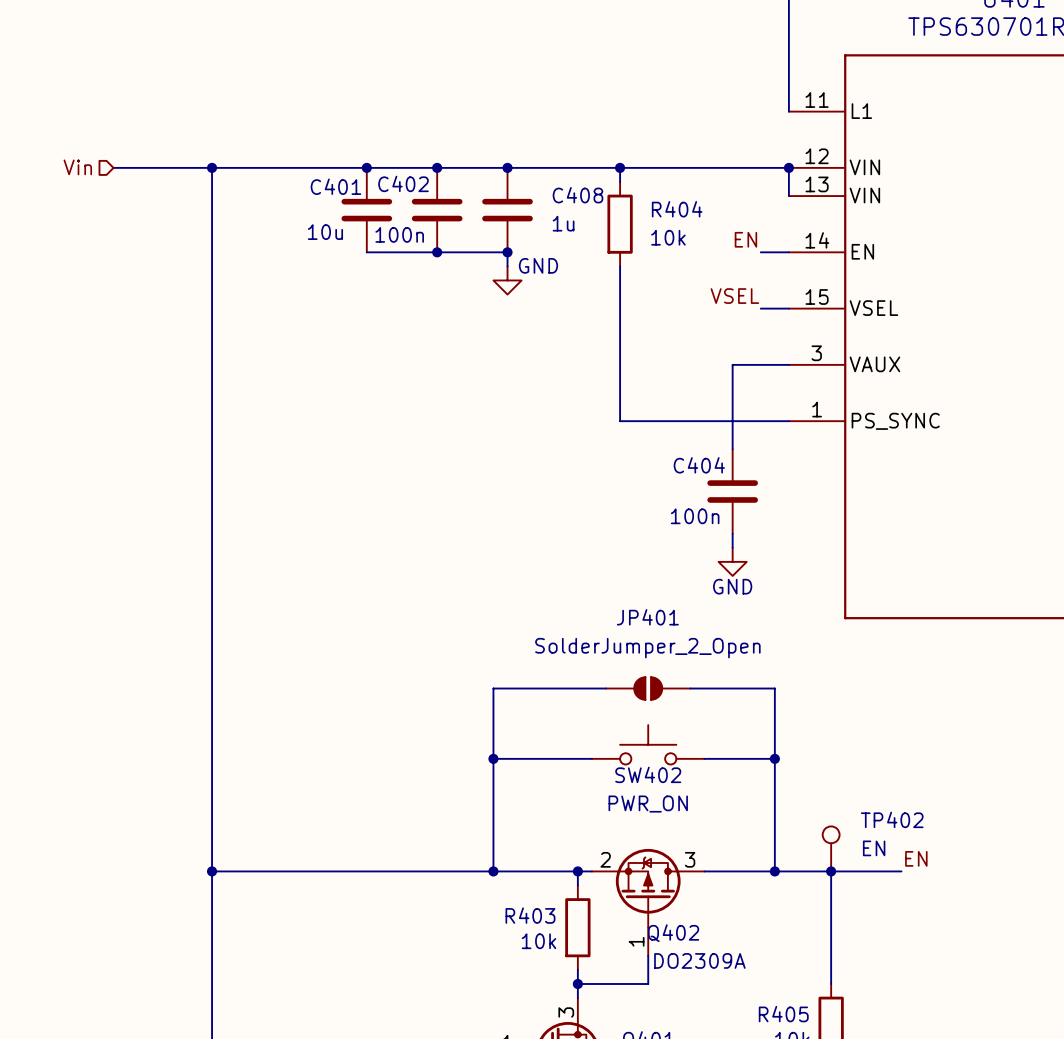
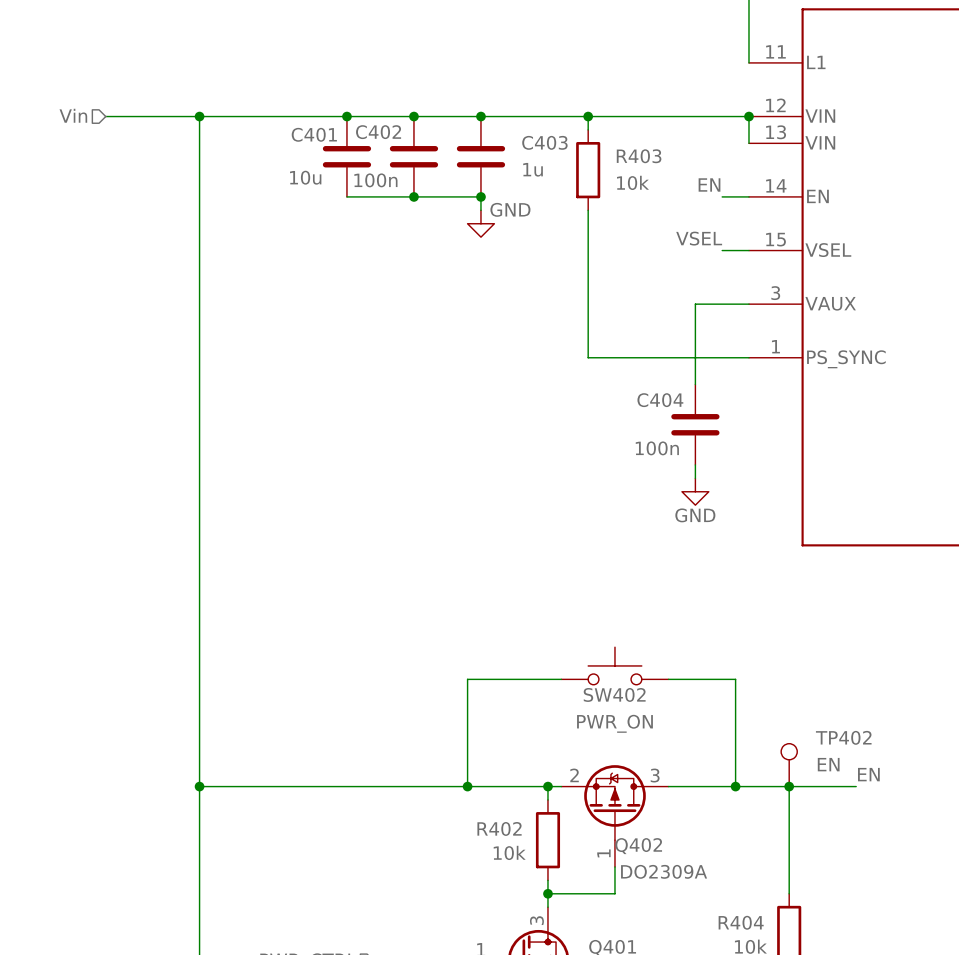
C408 name: C408 (577, 195) -> C403 (544, 142)
R404 name: R404 (677, 209) -> R403 (639, 156)
wire: (606, 688) (493, 688) (493, 758) -> none
JP401: SolderJumper_2_Open (648, 688) -> none
wire: (690, 688) (774, 688) (774, 758) -> none
junction: (493, 758) -> none
junction: (774, 758) -> none
R403 name: R403 (530, 915) -> R402 (499, 828)
R405 name: R405 (783, 1014) -> R404 (741, 922)

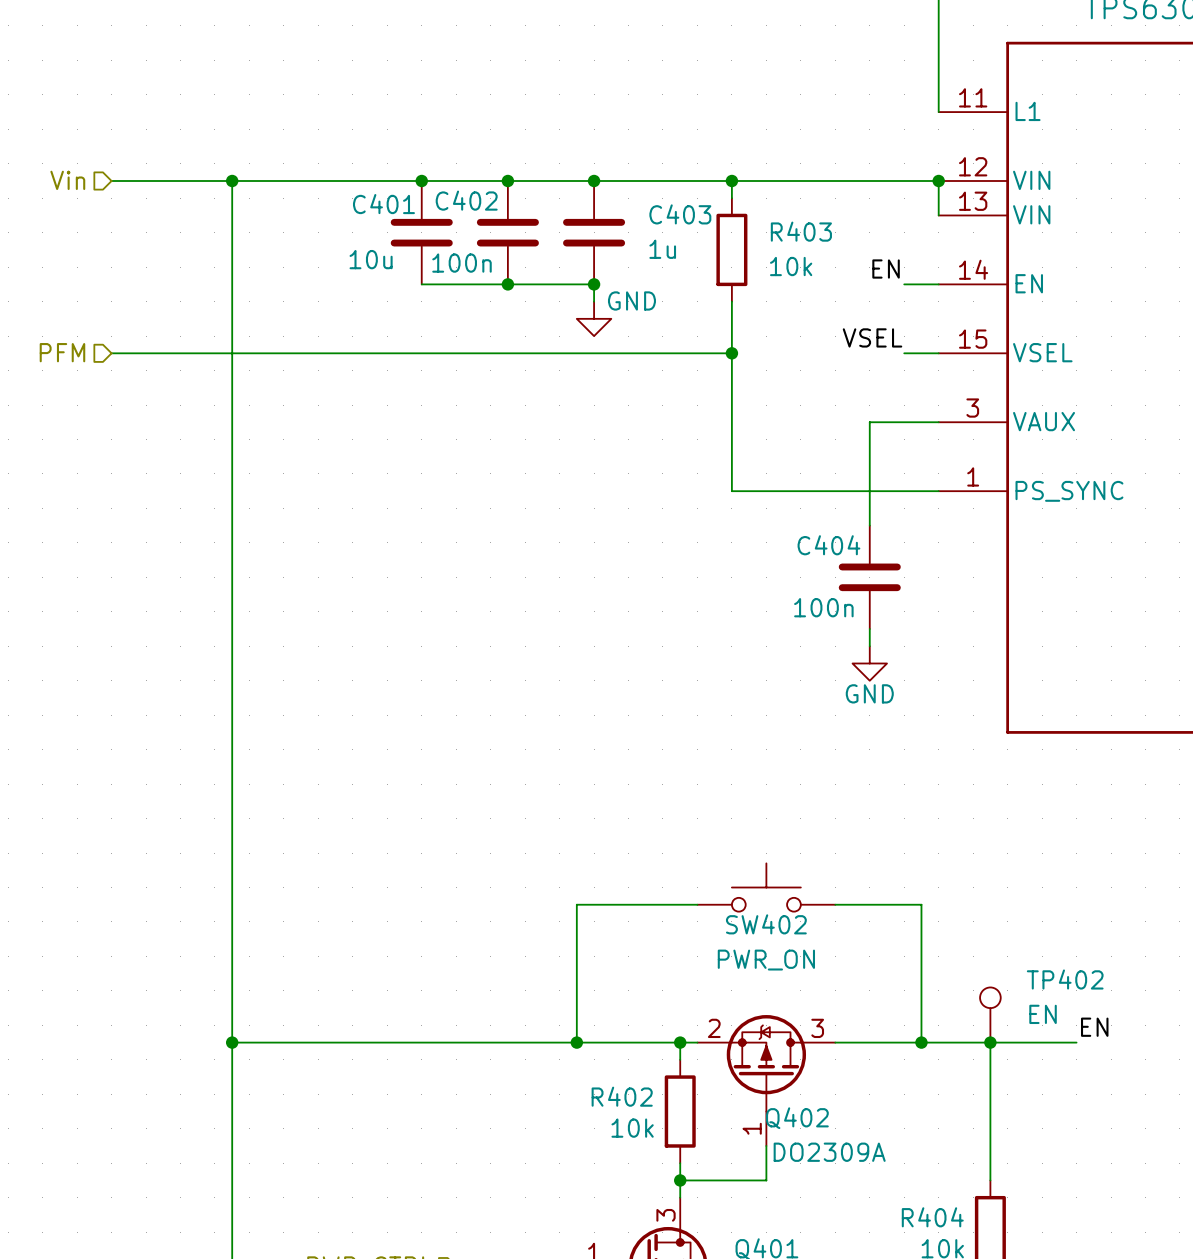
hierarchical label: none -> PFM (62, 352)
wire: none -> (111, 353) (731, 353)
junction: none -> (731, 353)

